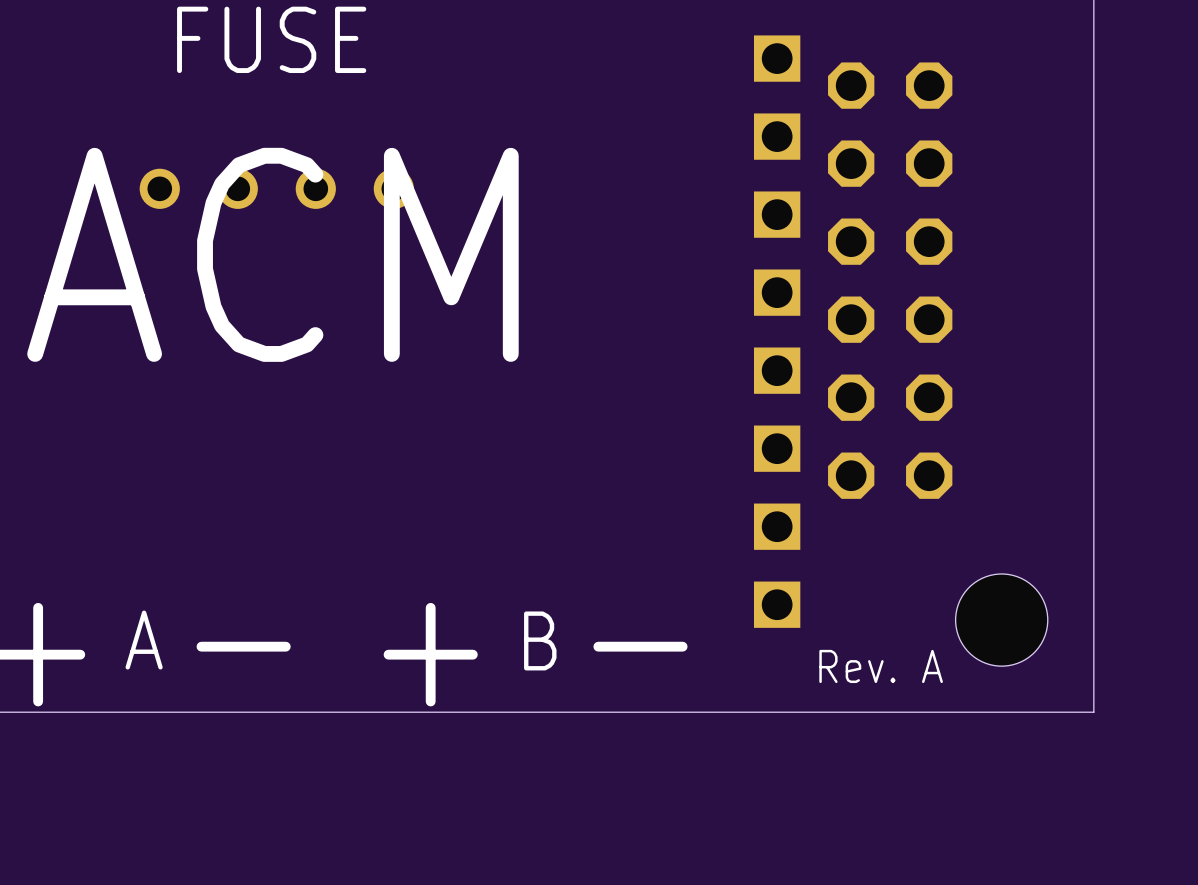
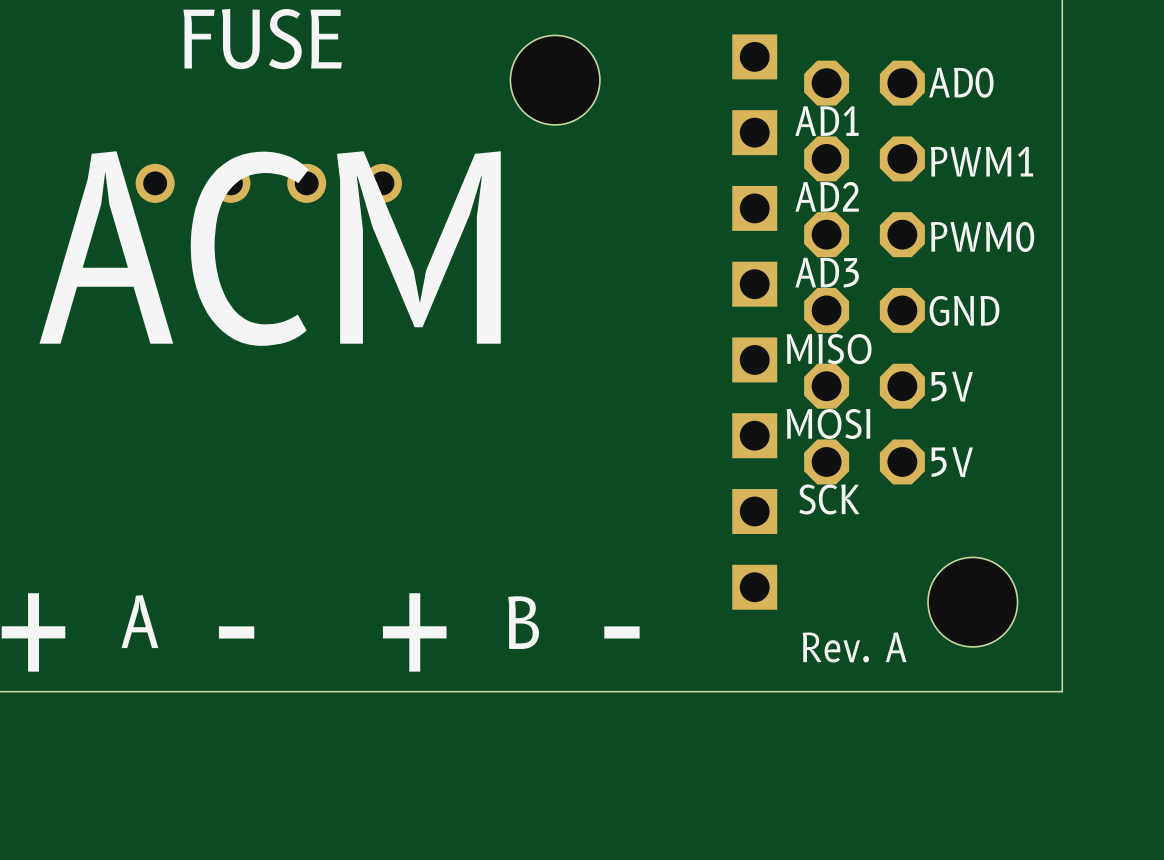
hole: none -> (555, 80)
text: none -> AD0 (961, 82)
text: none -> AD1 (827, 121)
text: none -> PWM1 (981, 161)
text: none -> AD2 (827, 196)
text: none -> PWM0 (982, 236)
text: none -> AD3 (827, 272)
text: none -> GND (964, 310)
text: none -> MISO (829, 349)
text: none -> 5V (952, 386)
text: none -> MOSI (828, 423)
text: none -> 5V (952, 462)
text: none -> SCK (829, 499)

